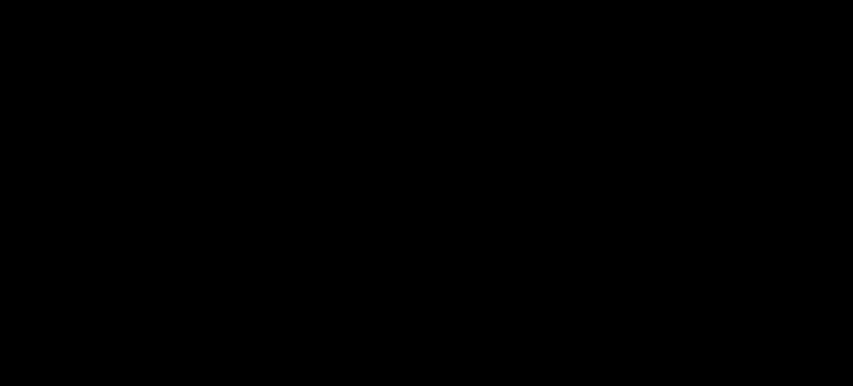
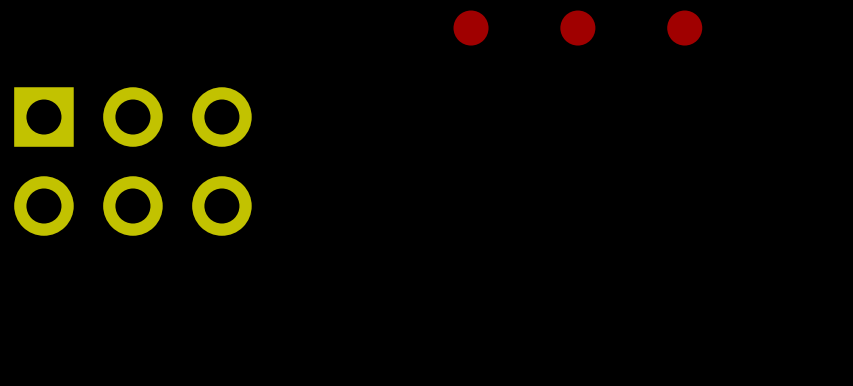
part: none -> (471, 28)
part: none -> (577, 28)
part: none -> (684, 28)
part: none -> (132, 161)

